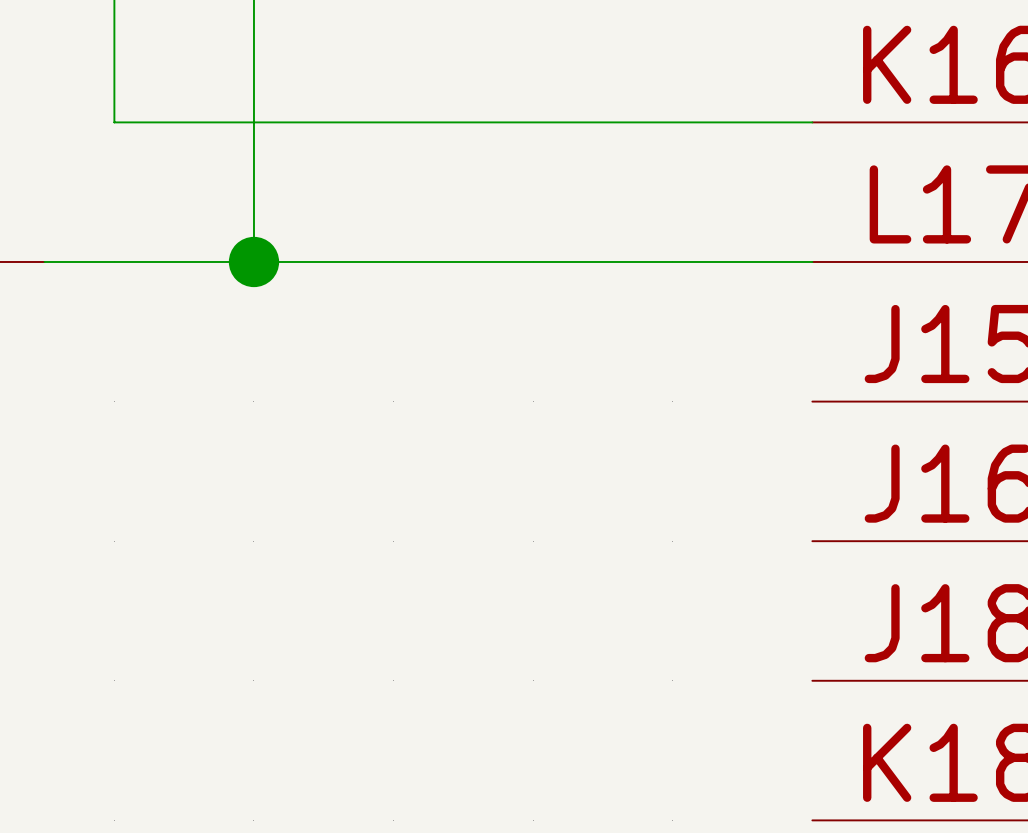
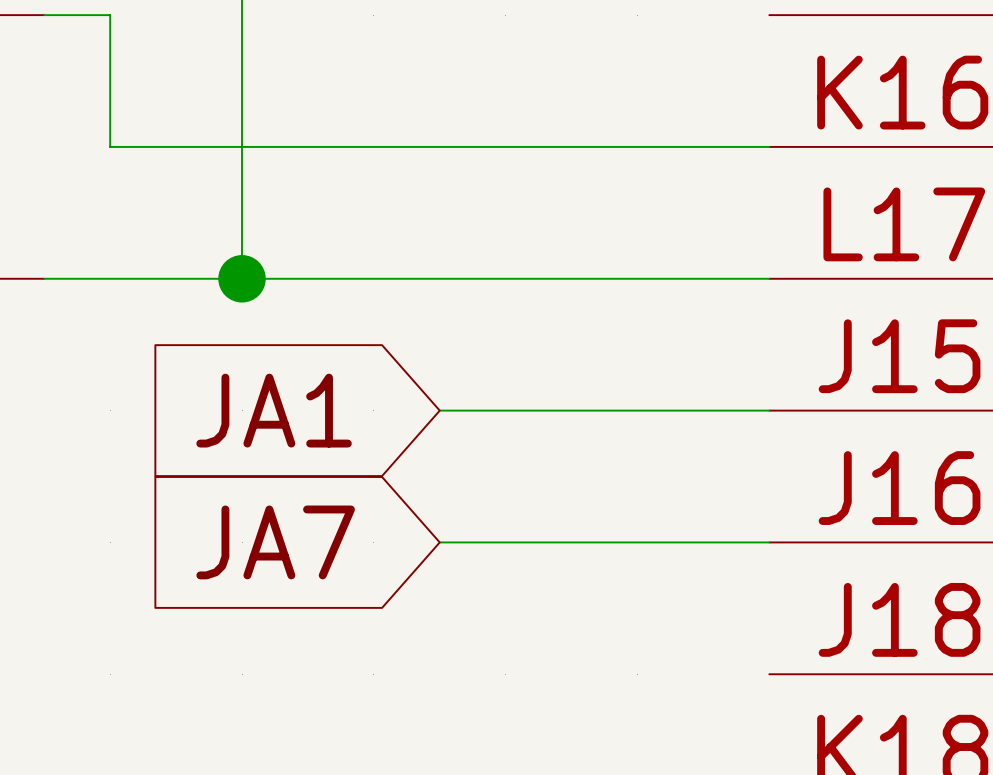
global label: none -> JA1 (274, 410)
wire: none -> (439, 410) (769, 410)
global label: none -> JA7 (275, 542)
wire: none -> (439, 542) (769, 542)

